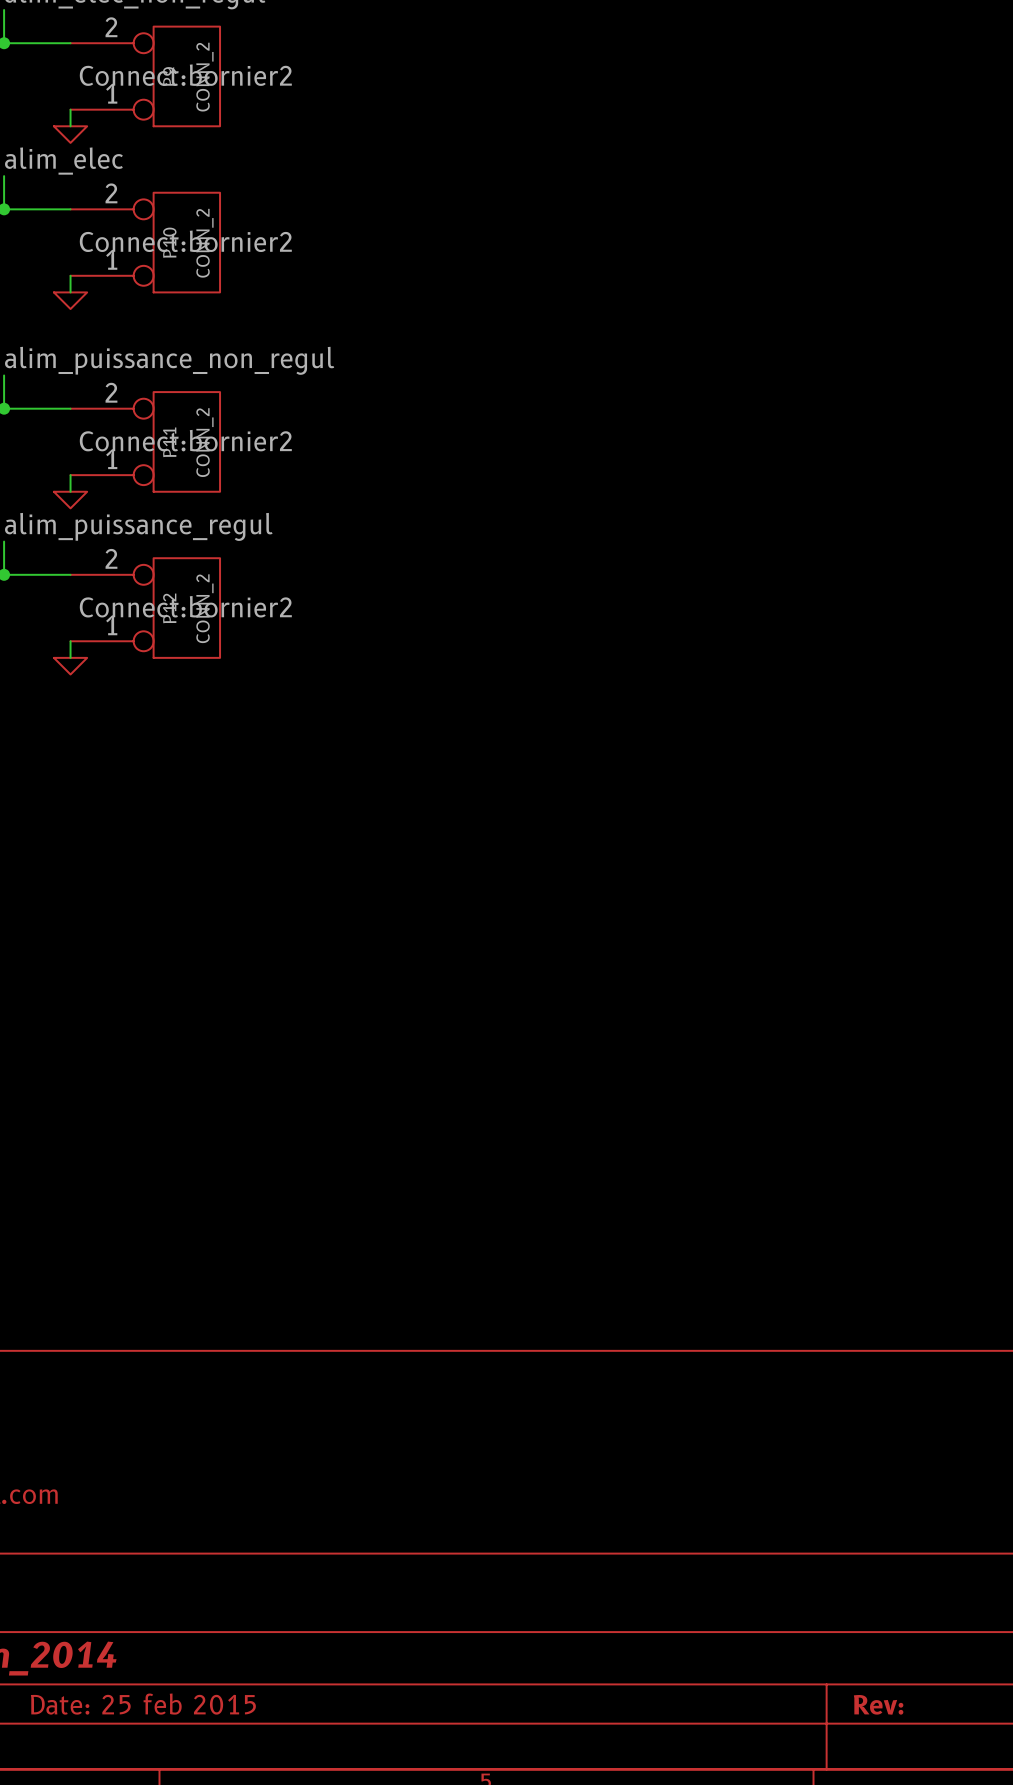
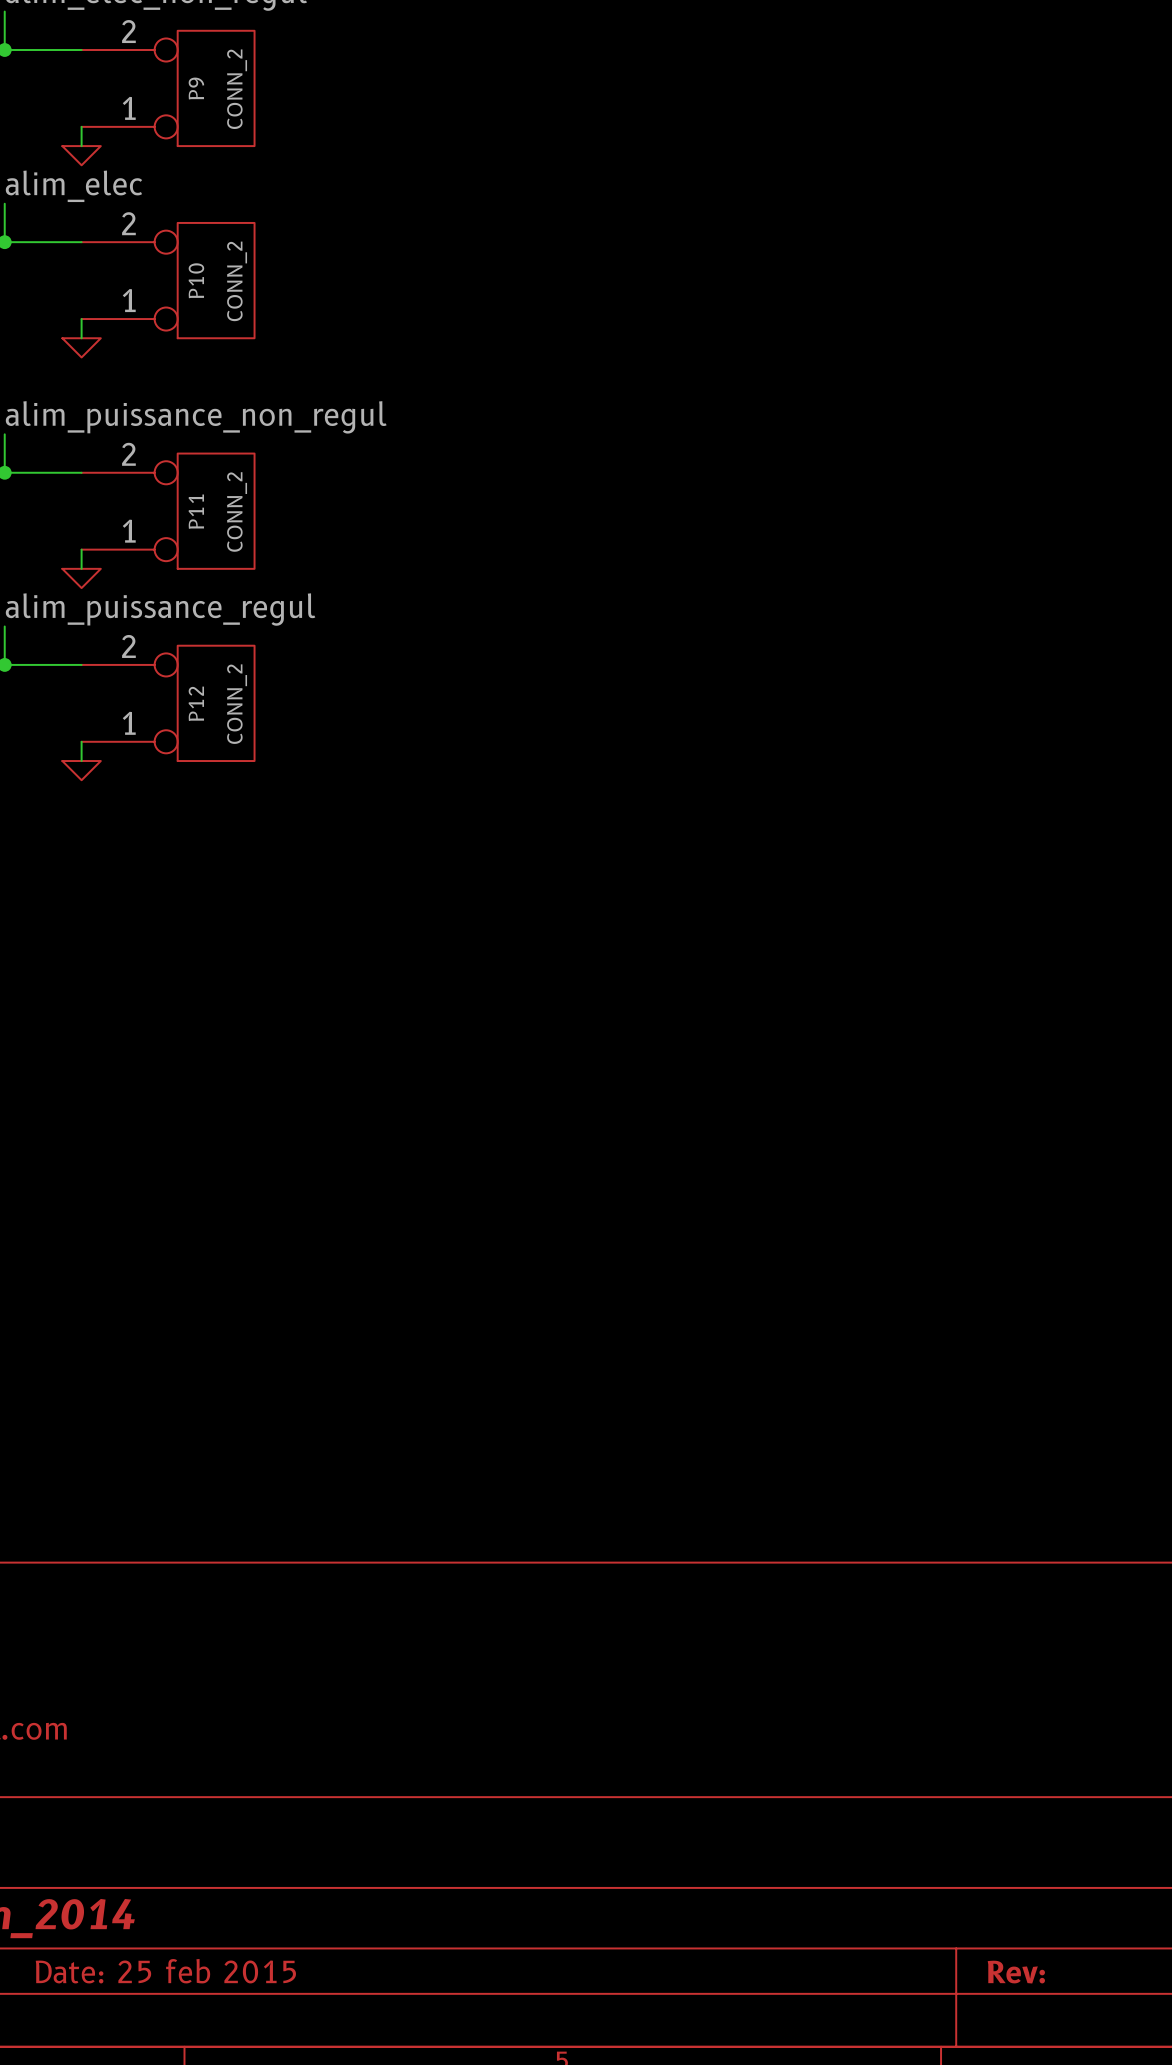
P9 text: Connect:bornier2 (185, 75) -> none
P10 text: Connect:bornier2 (185, 241) -> none
P11 text: Connect:bornier2 (185, 440) -> none
P12 text: Connect:bornier2 (185, 606) -> none

